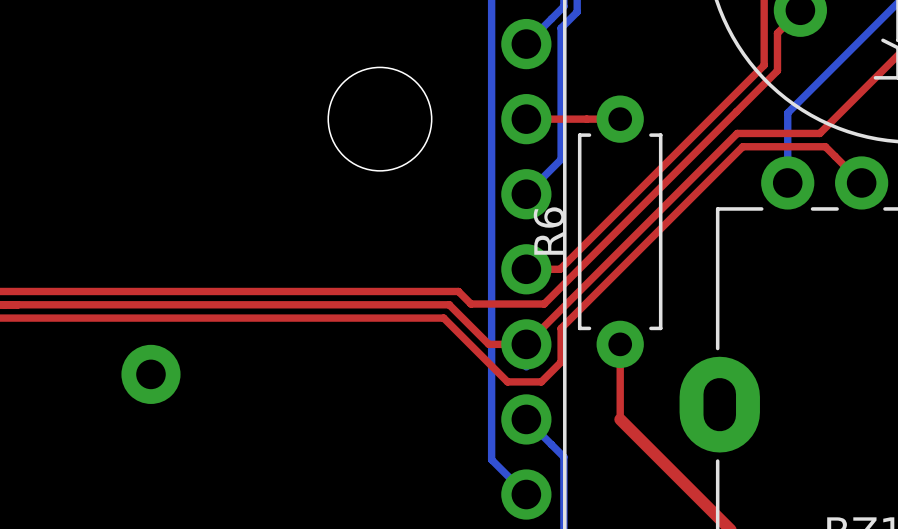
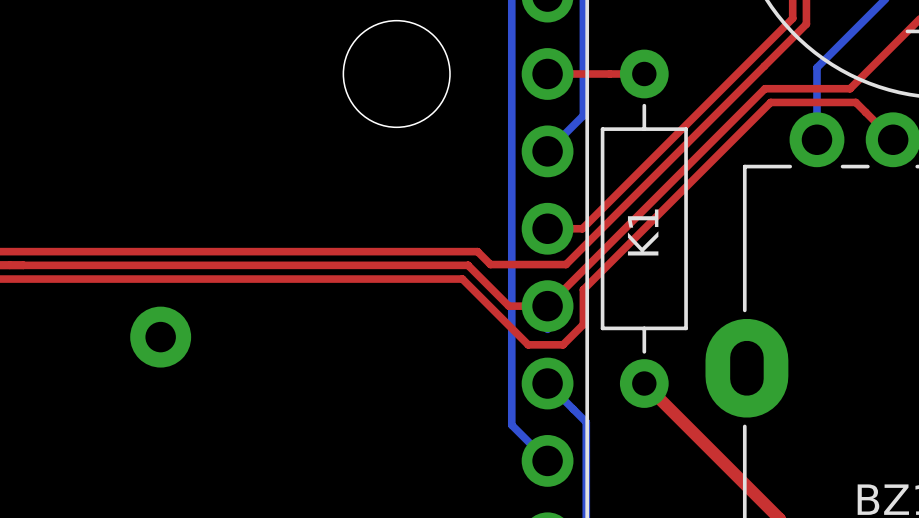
R6: (620, 231) -> none
part: none -> K1 (644, 228)
top track: (620, 344) (620, 419) -> none

